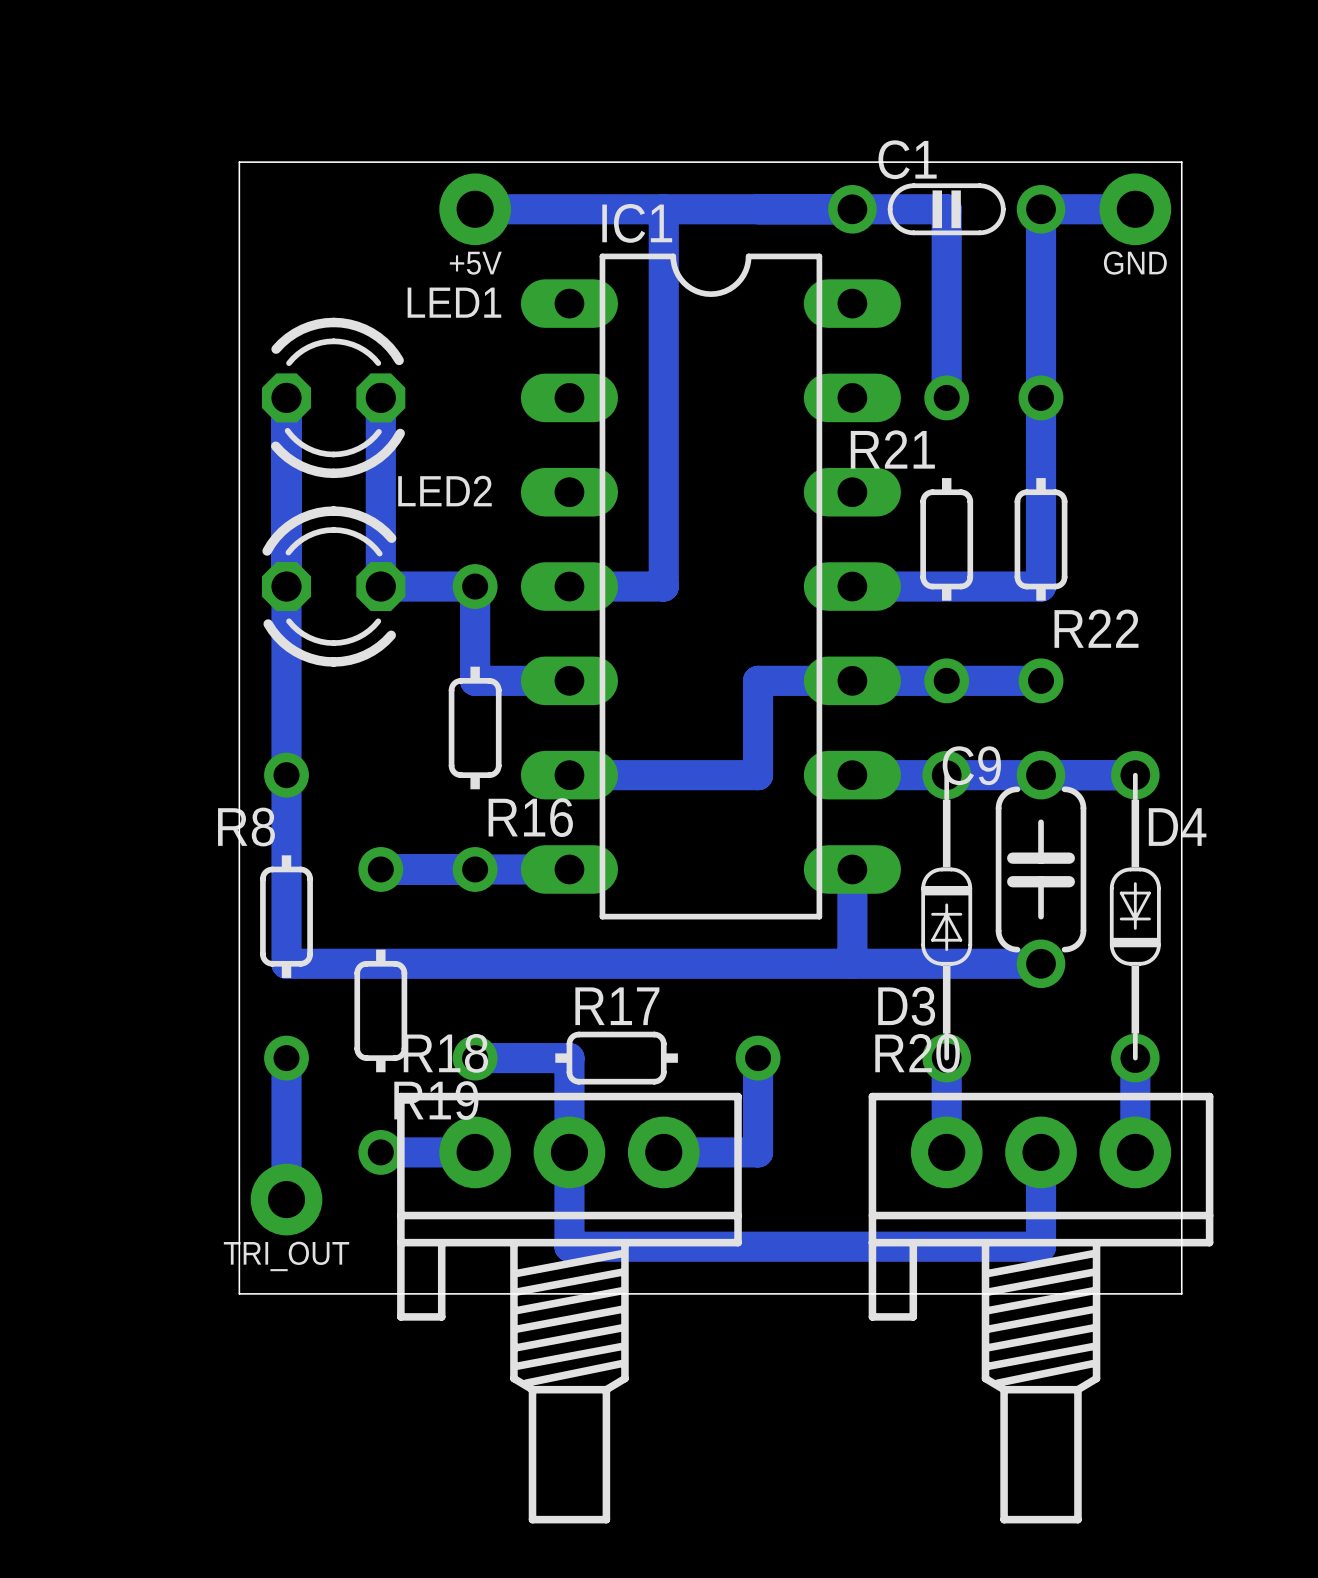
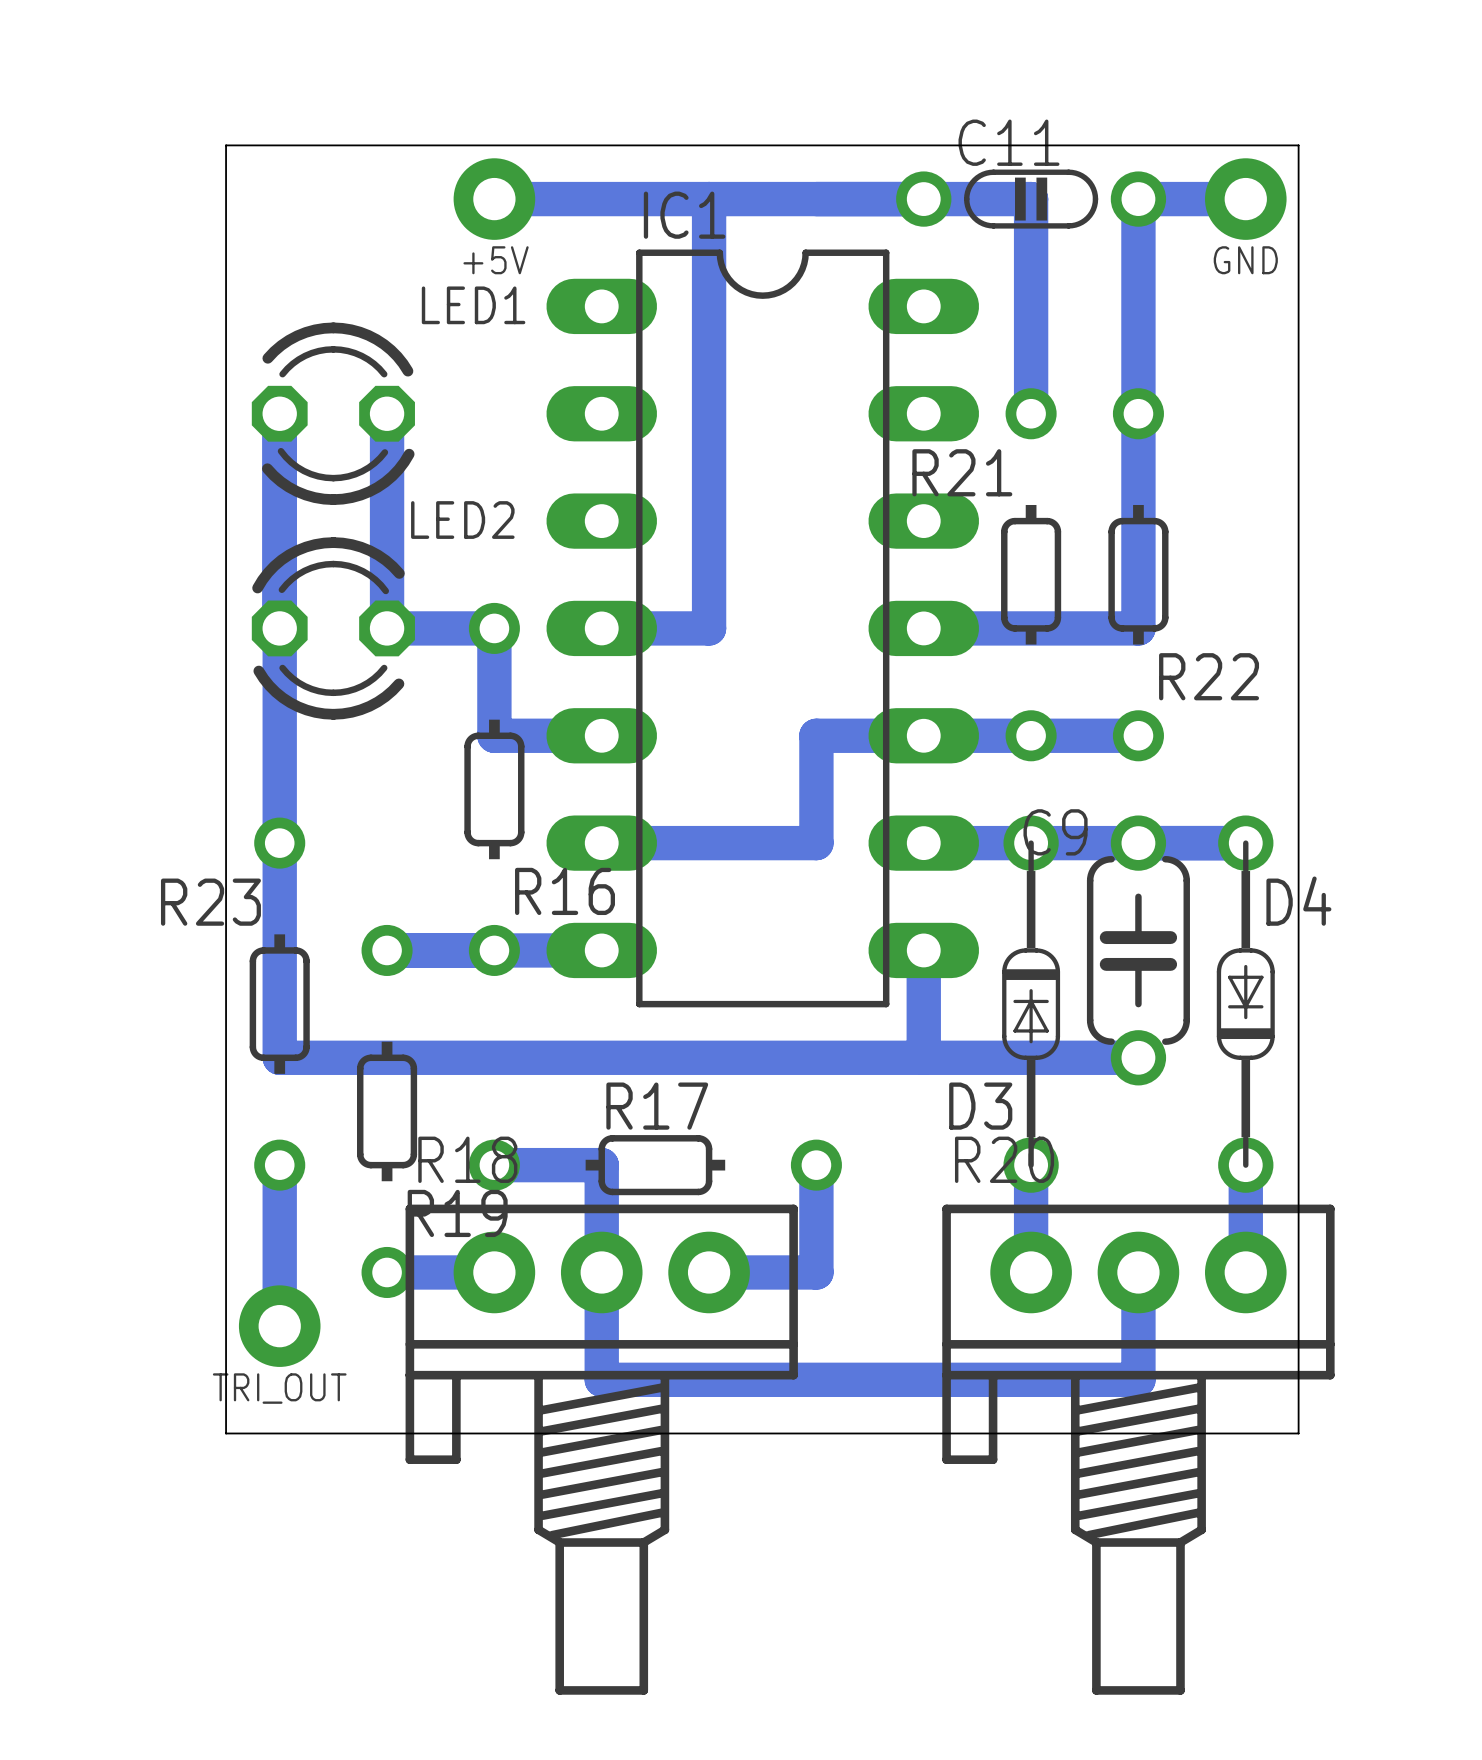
C1 name: C1 (907, 159) -> C11 (1008, 142)
R8 name: R8 (246, 827) -> R23 (210, 902)

